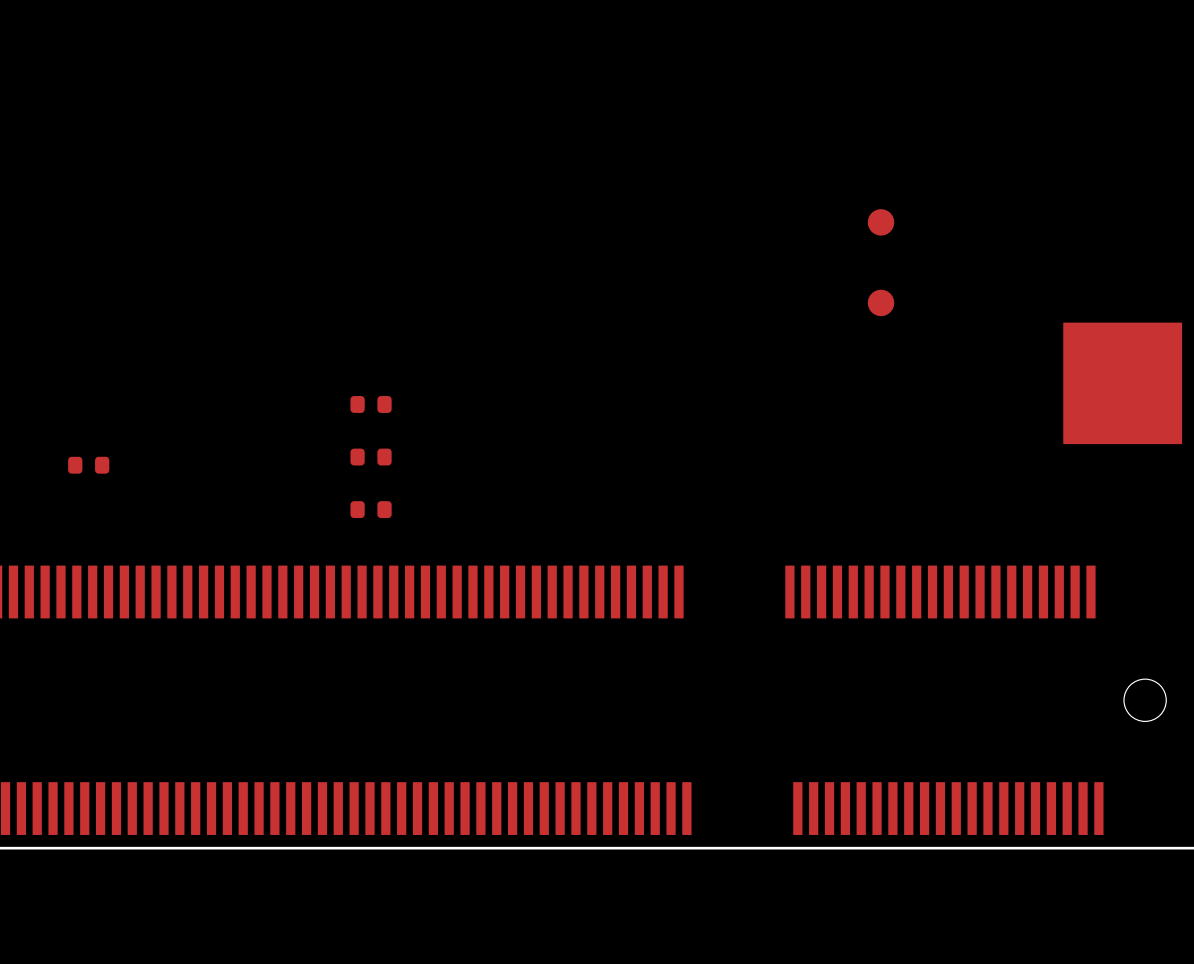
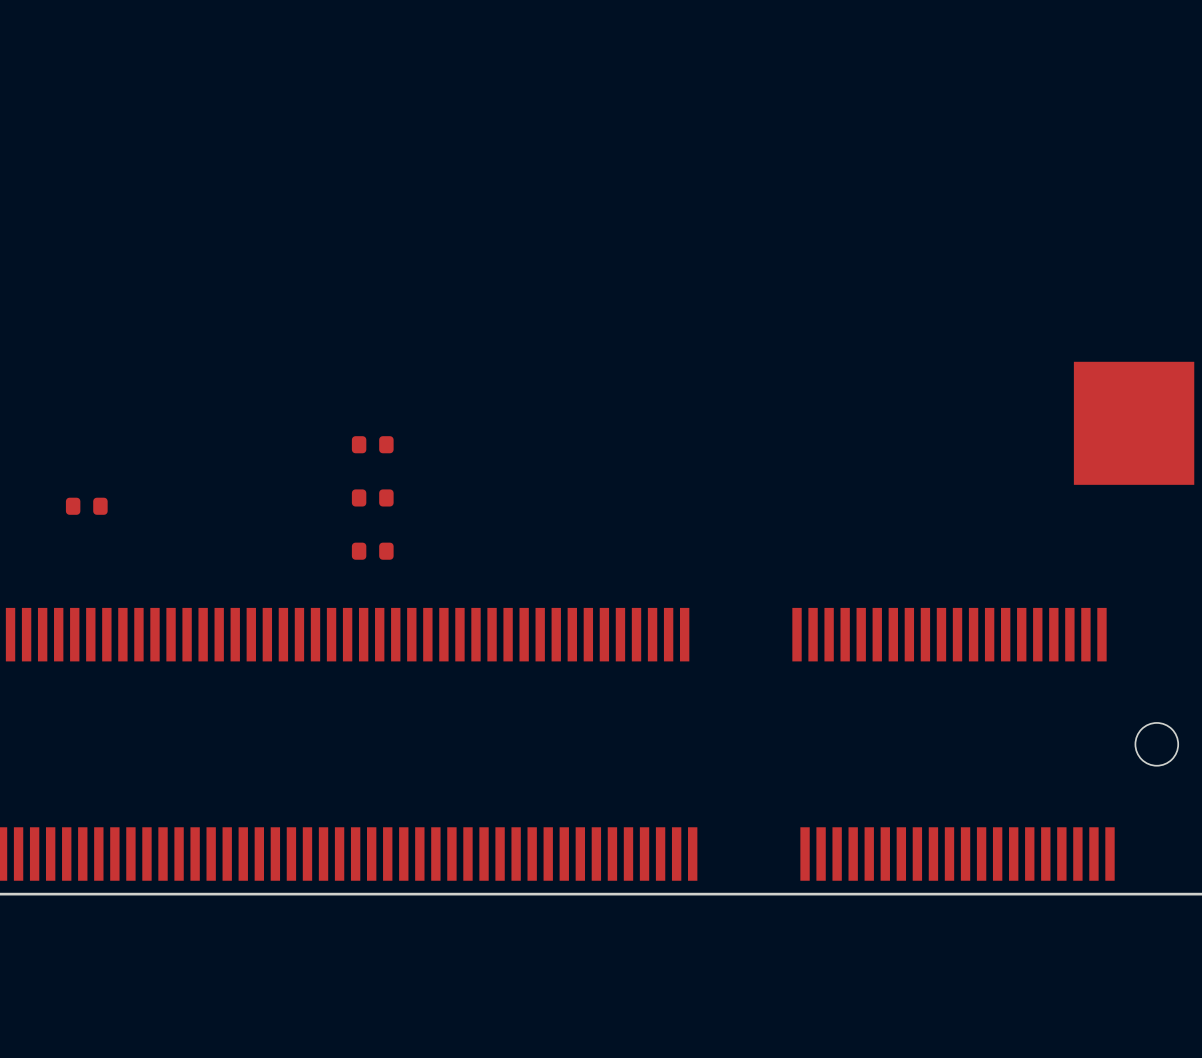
part: (881, 222) -> none
part: (881, 302) -> none

